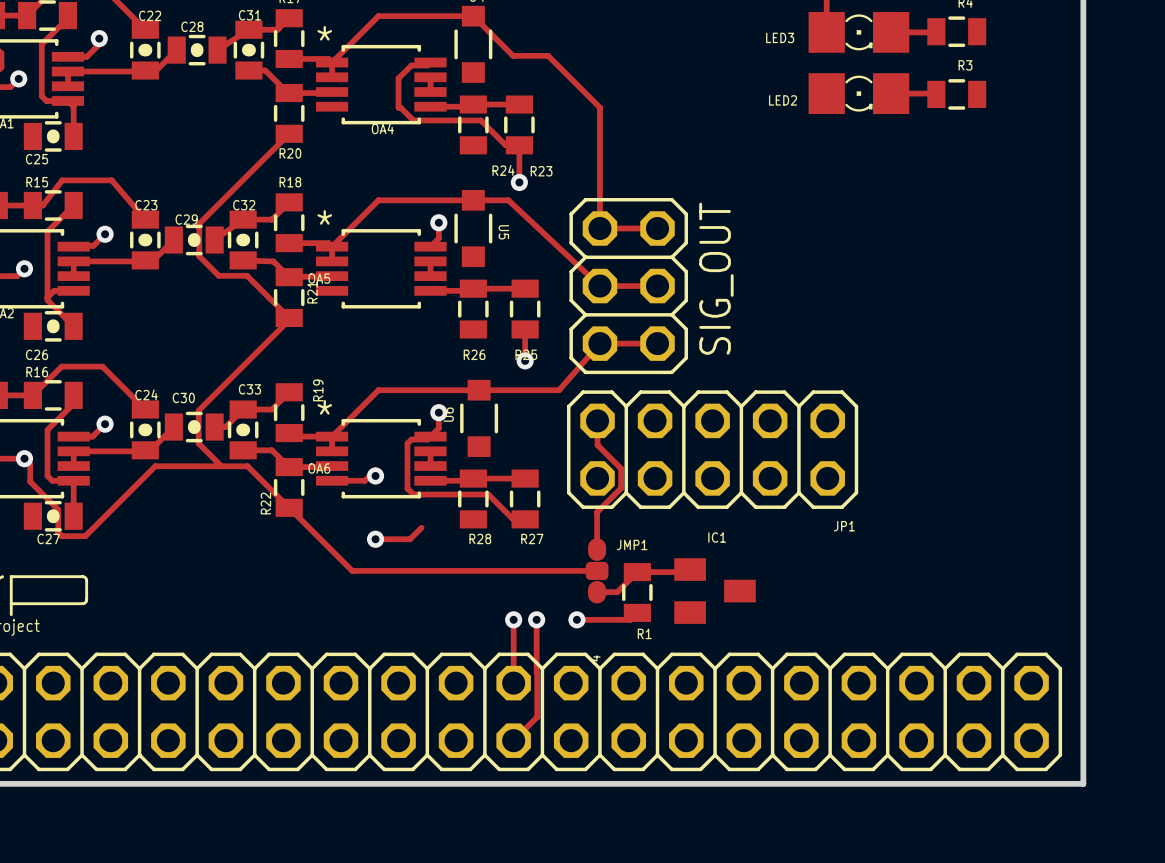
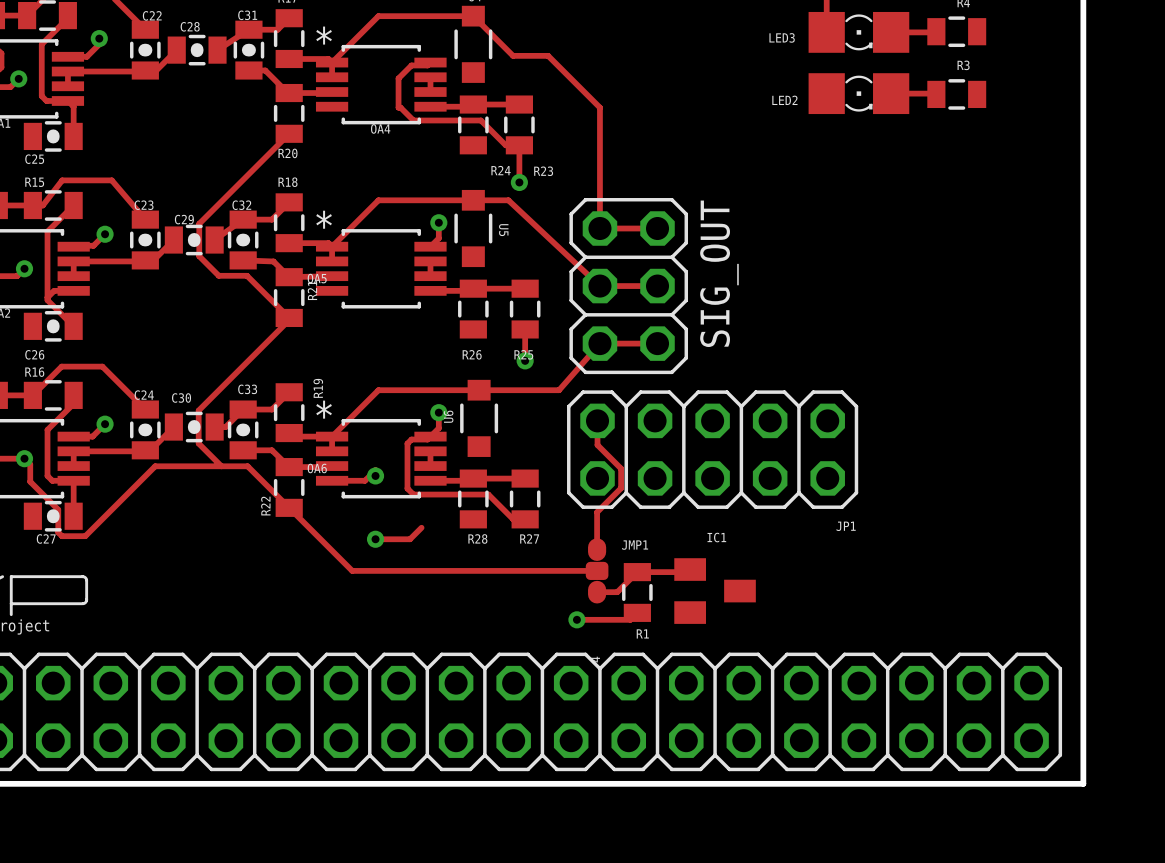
track: (513, 619) (513, 683) -> none
via: (513, 619) -> none
track: (536, 619) (537, 717) (513, 740) -> none
via: (536, 619) -> none

